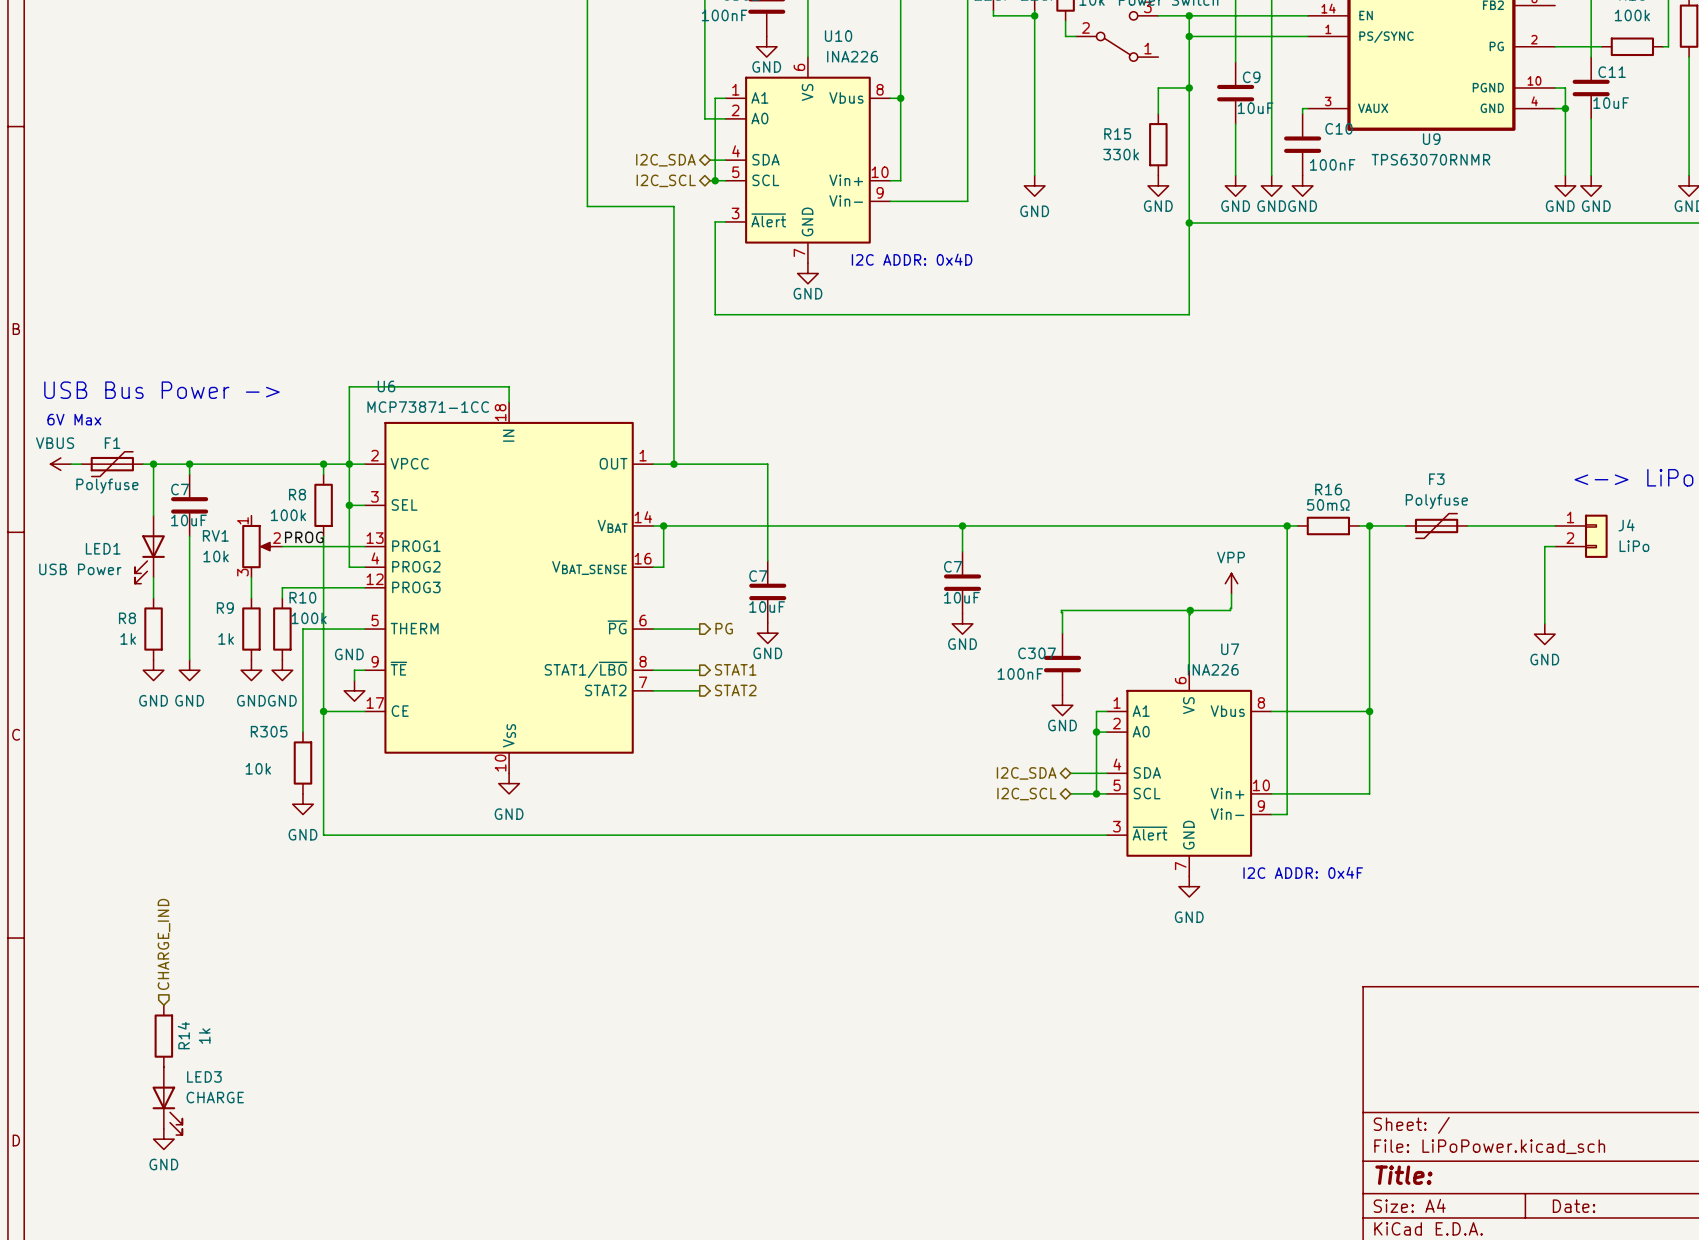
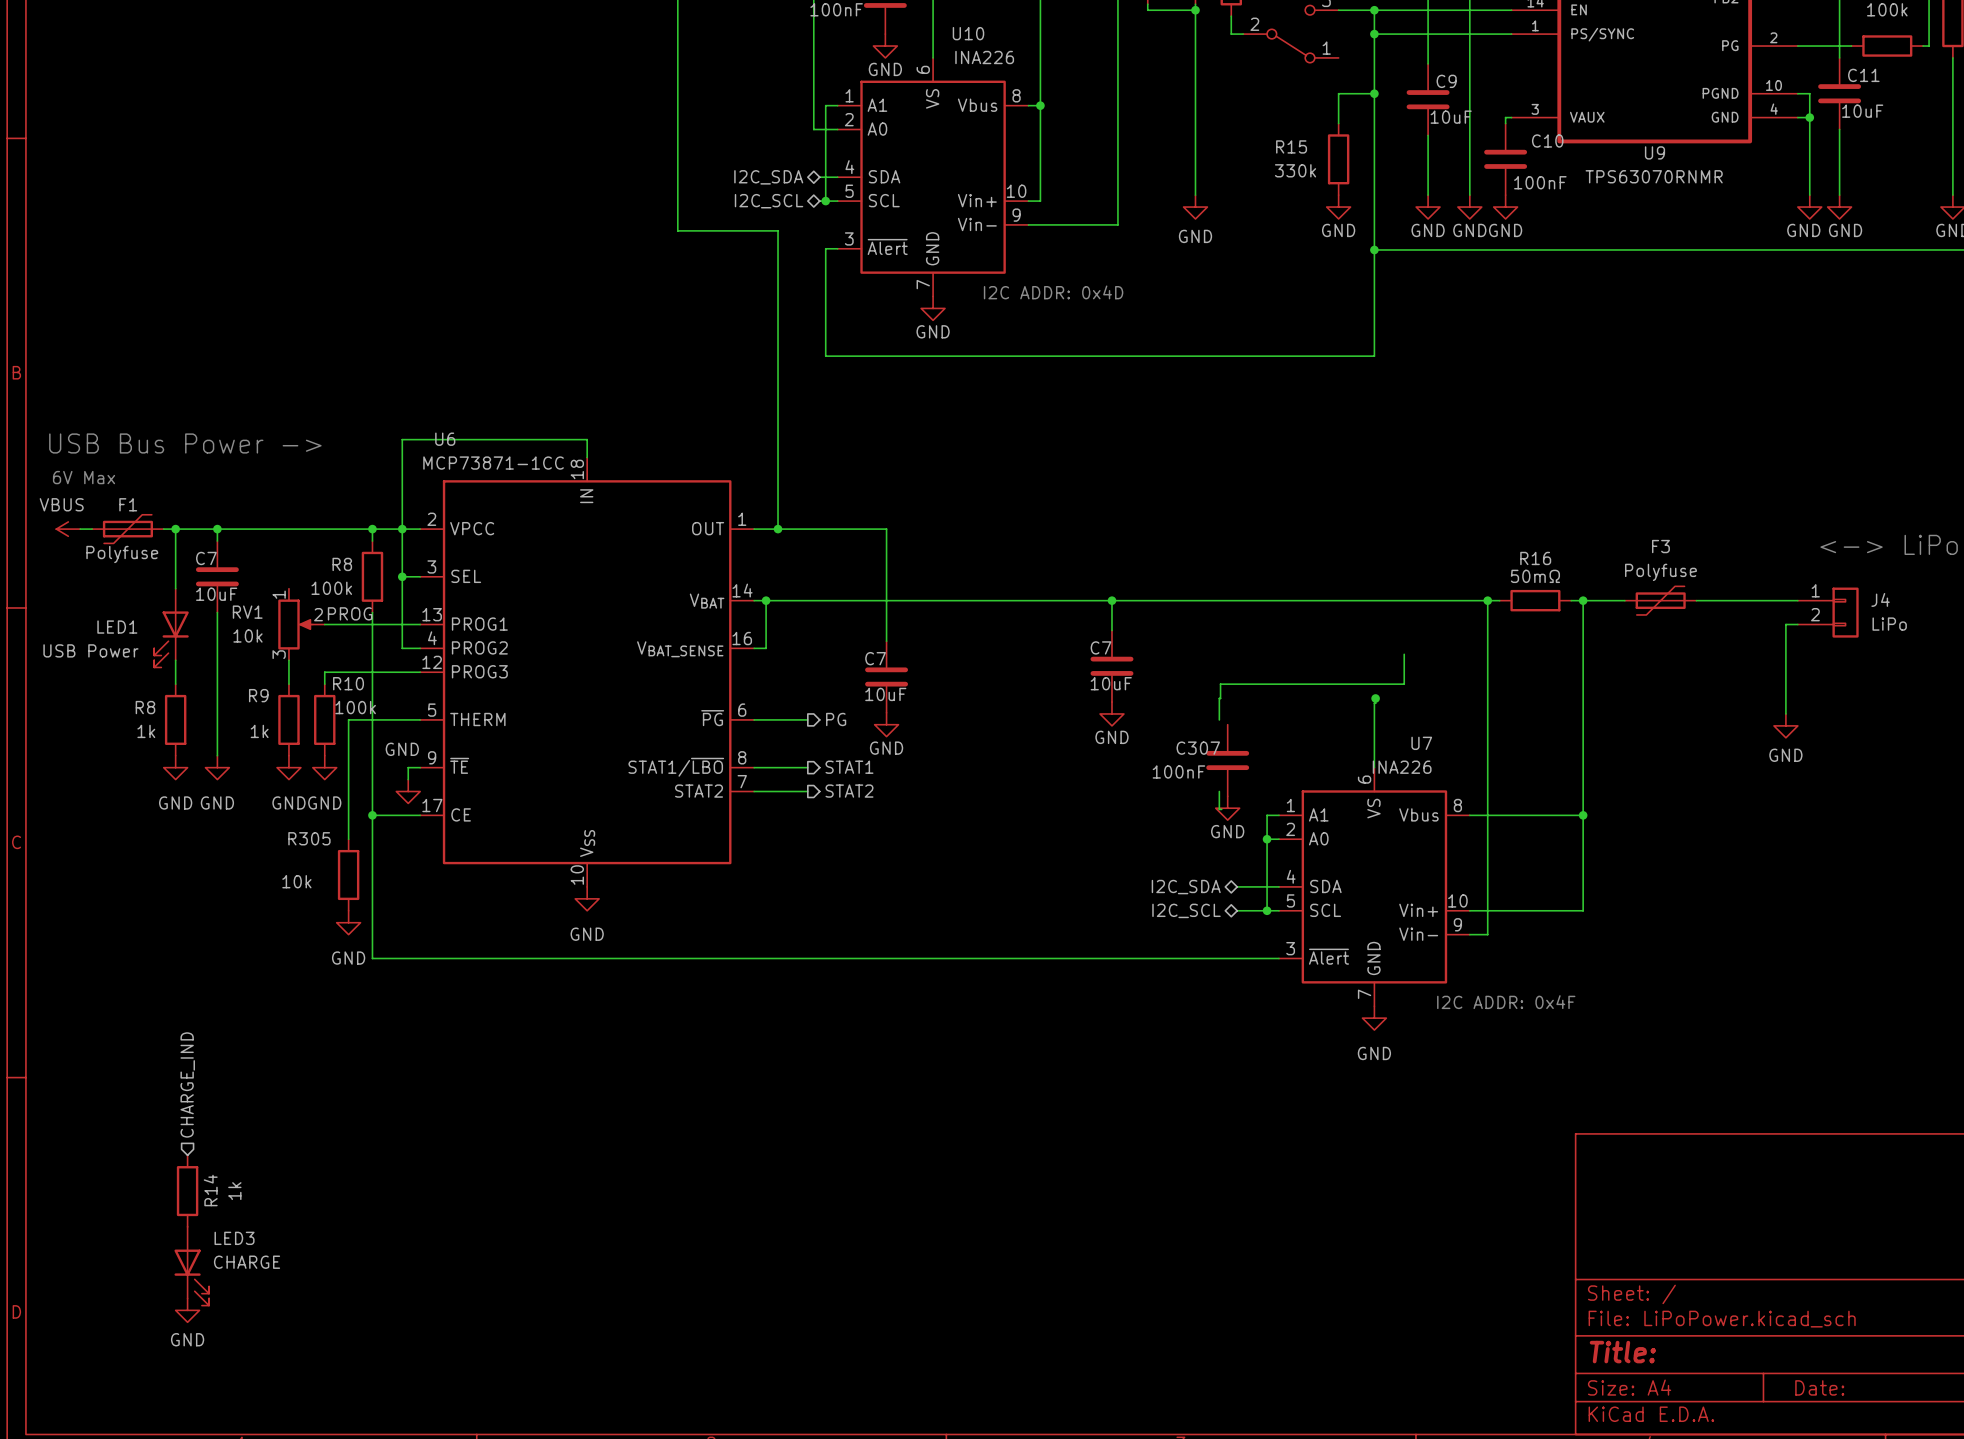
wire: none -> (1404, 654) (1404, 684) (1220, 684) (1219, 719)
power symbol: VPP (1231, 583) -> none
wire: (1231, 593) (1230, 610) (1061, 610) (1062, 633) -> none
wire: none -> (1219, 791) (1219, 809) (1221, 809)

